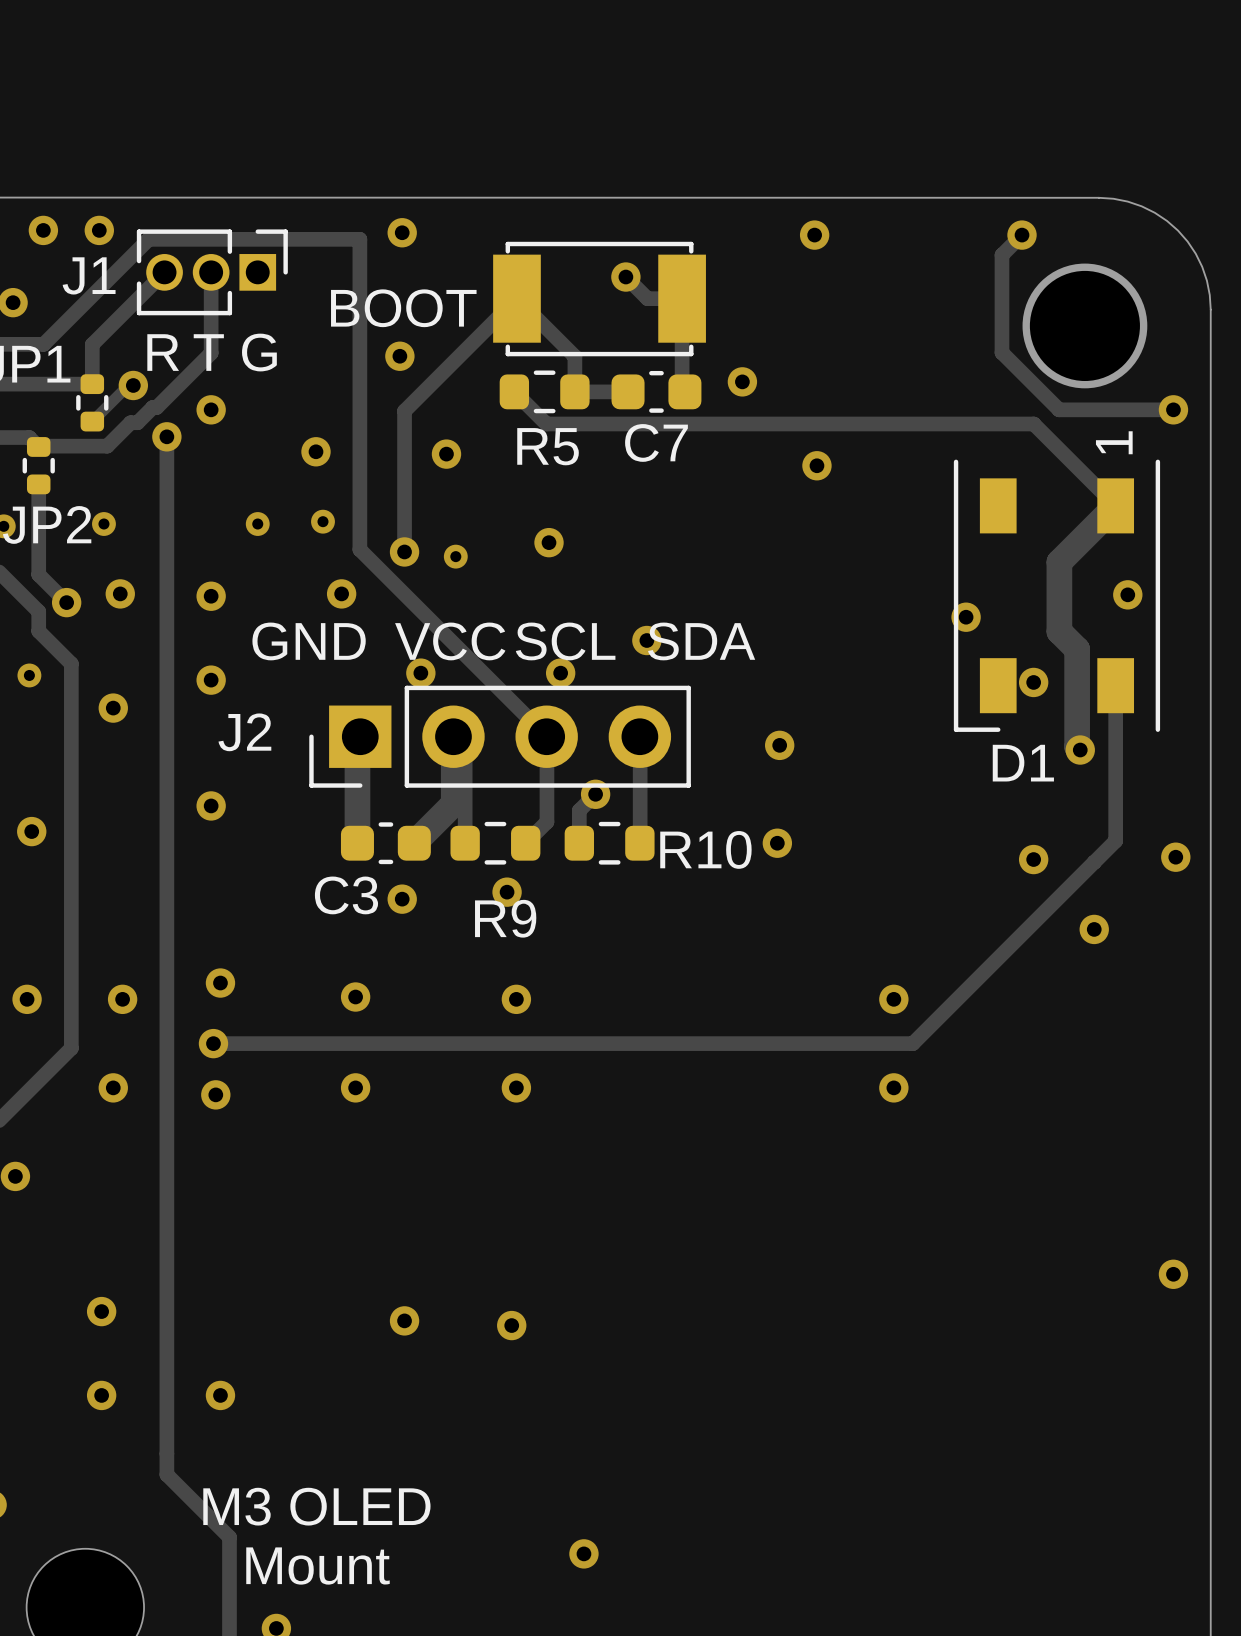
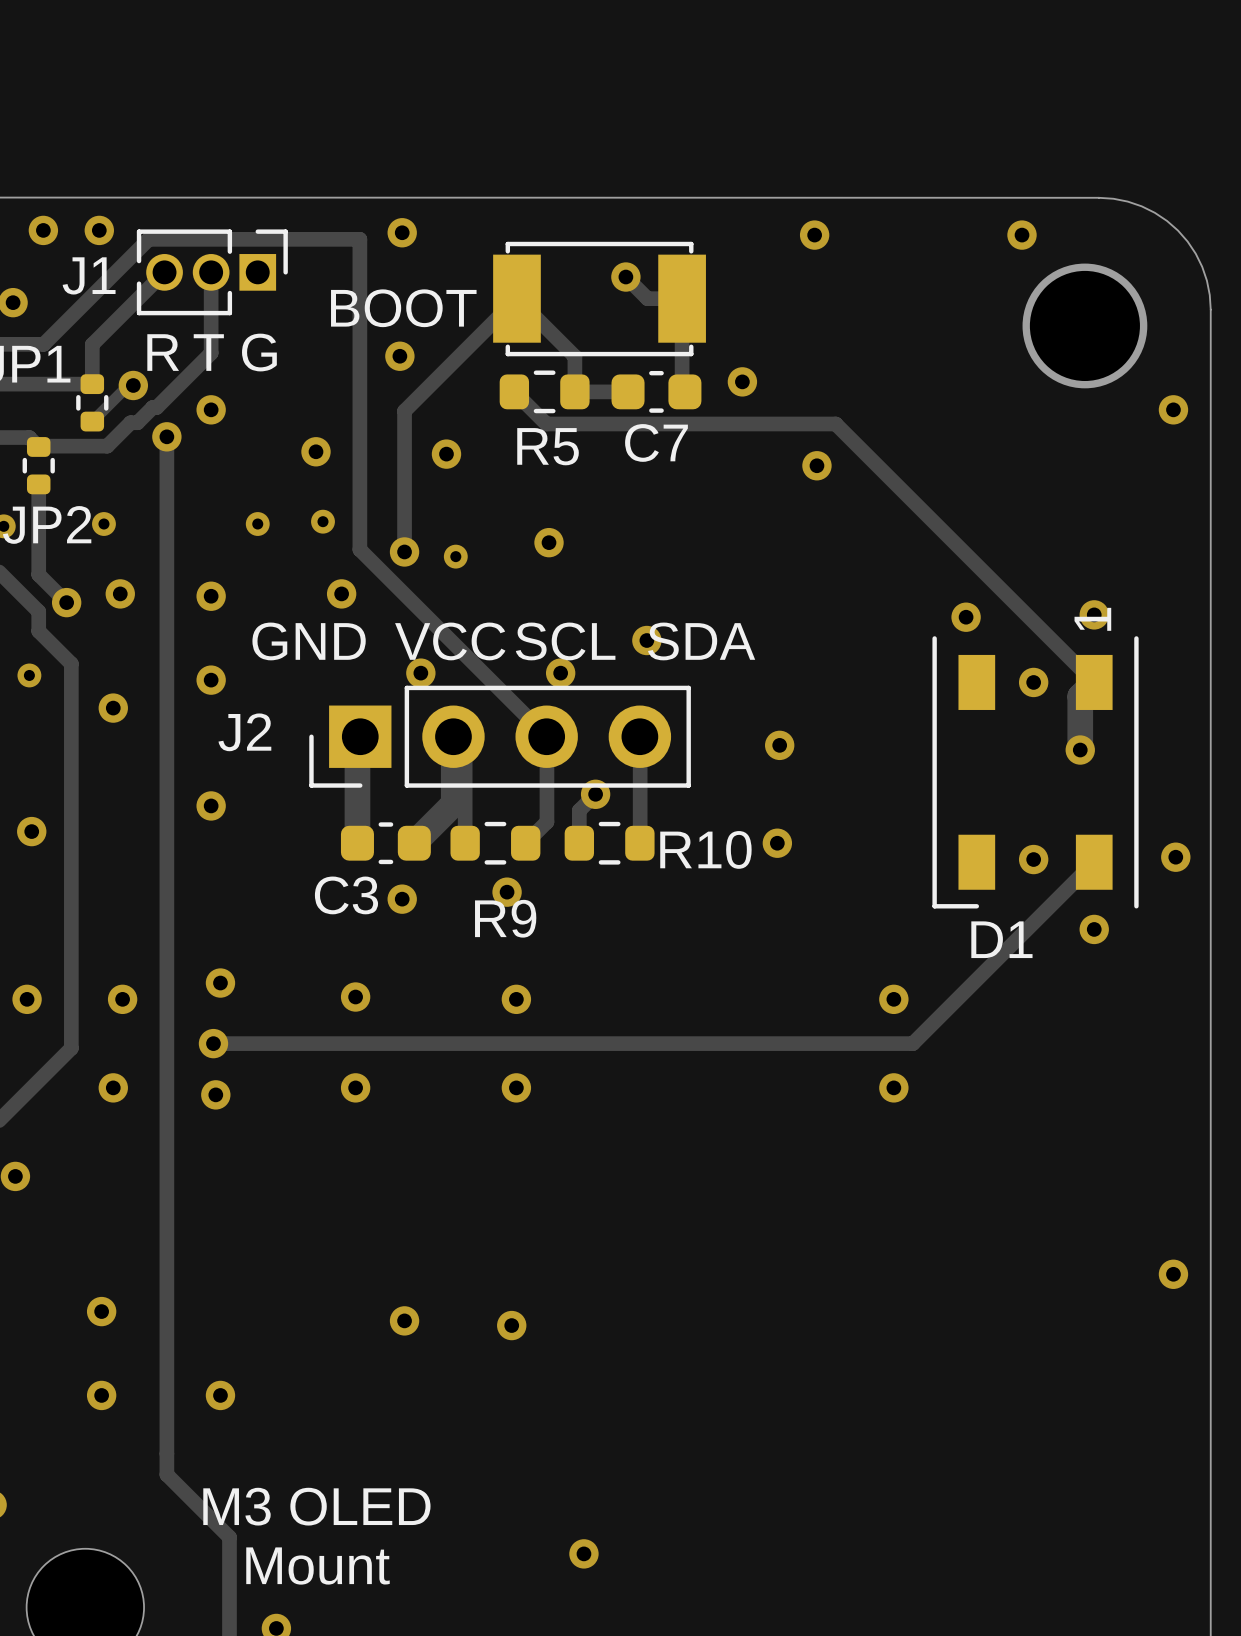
track: (1022, 235) (1001, 255) (1001, 352) (1059, 409) (1173, 409) -> none
track: (835, 423) (1033, 423) (1115, 505) (1059, 562) (1059, 631) (1077, 649) (1077, 746) (1080, 750) -> (835, 423) (1094, 682) (1080, 696) (1080, 750)
via position: (1127, 594) -> (1094, 614)
D1 position: (1056, 595) -> (1035, 772)
track: (1115, 685) (1115, 840) (1094, 862) -> none

